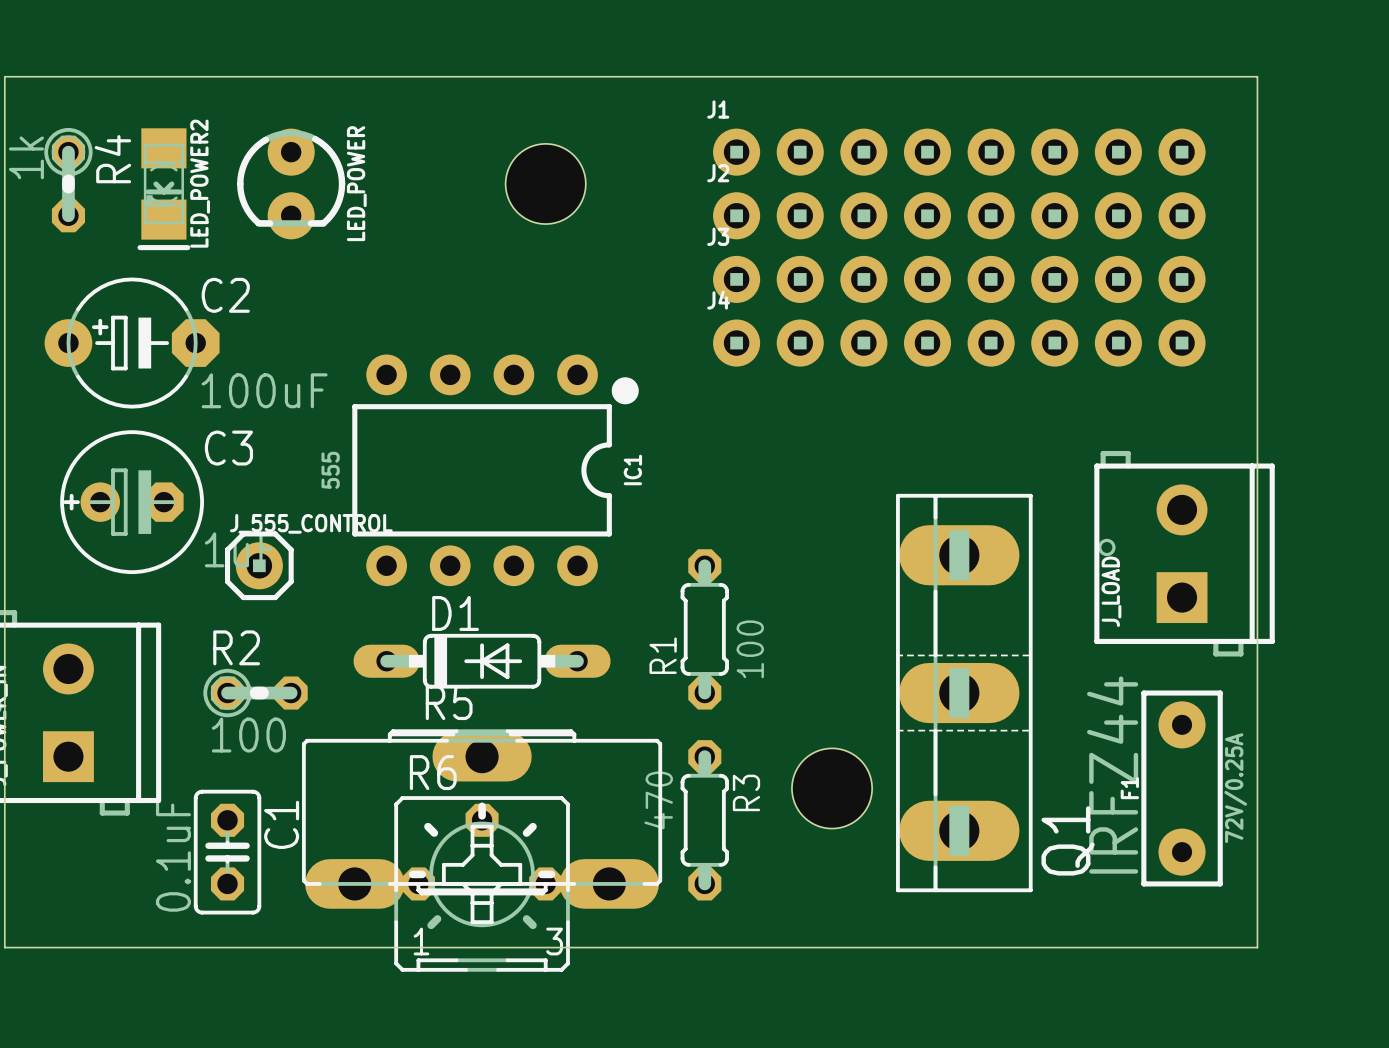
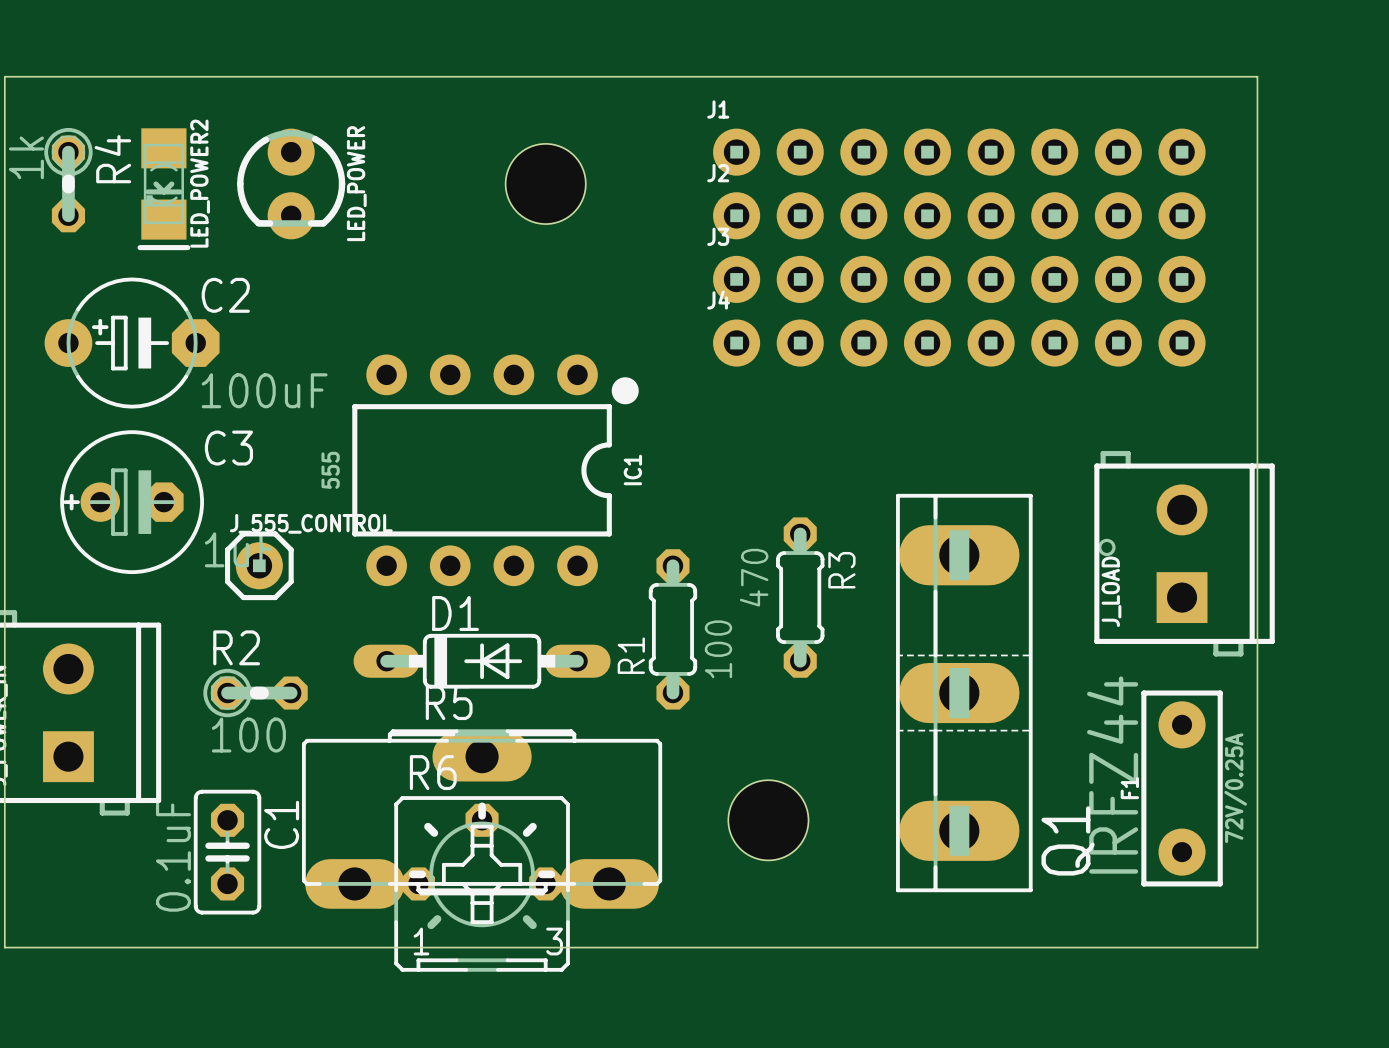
R1 position: (704, 629) -> (672, 629)
hole position: (832, 788) -> (768, 820)
R3 position: (704, 820) -> (800, 597)

